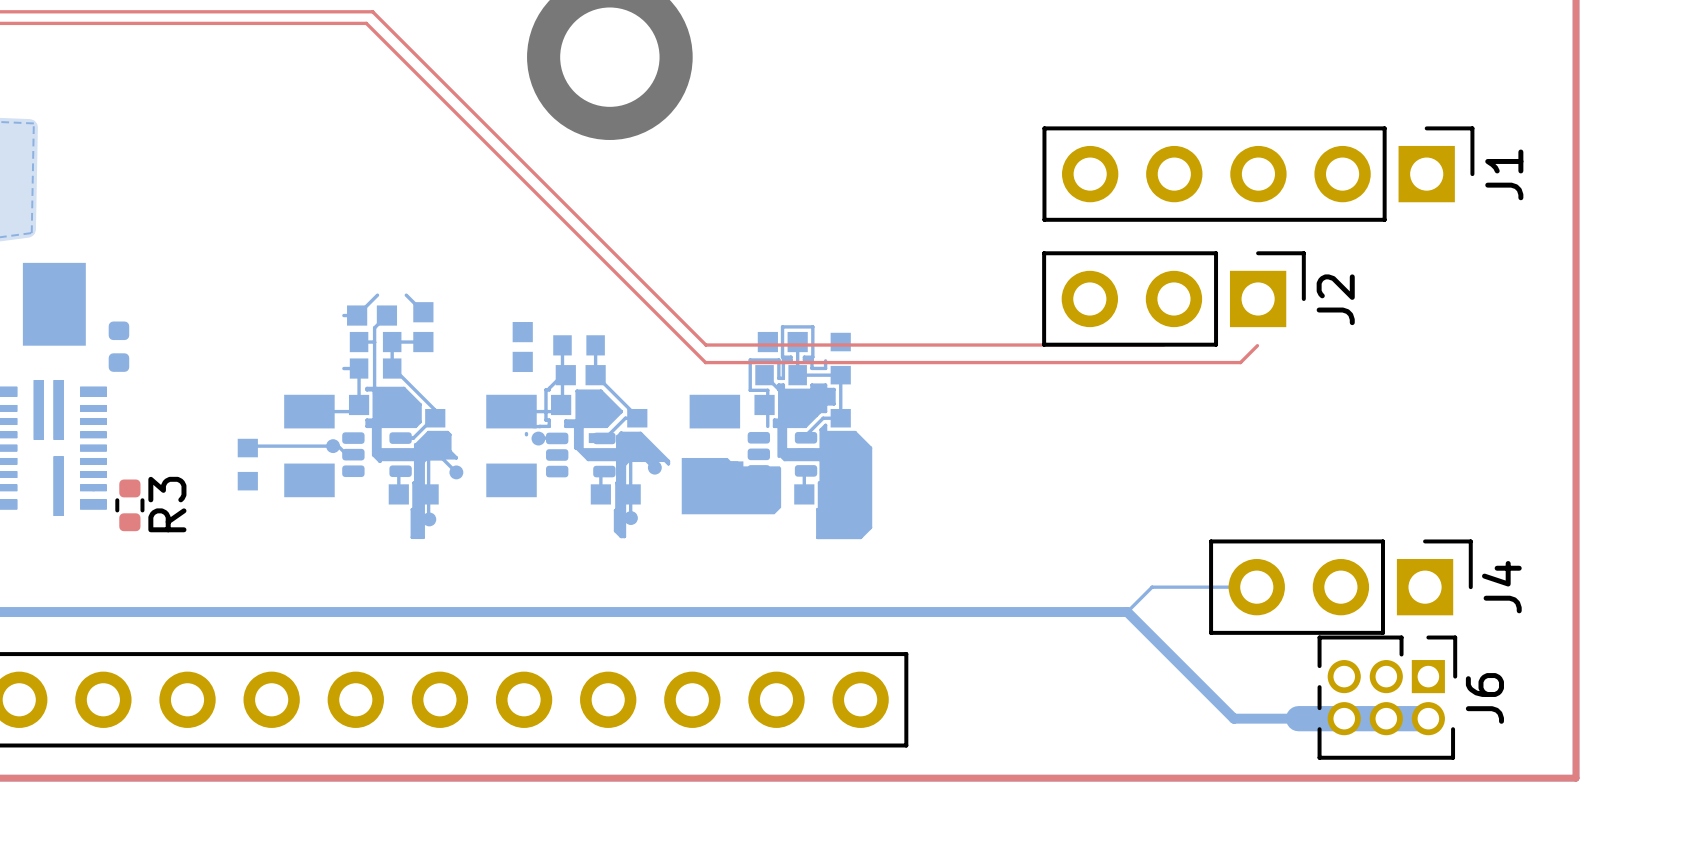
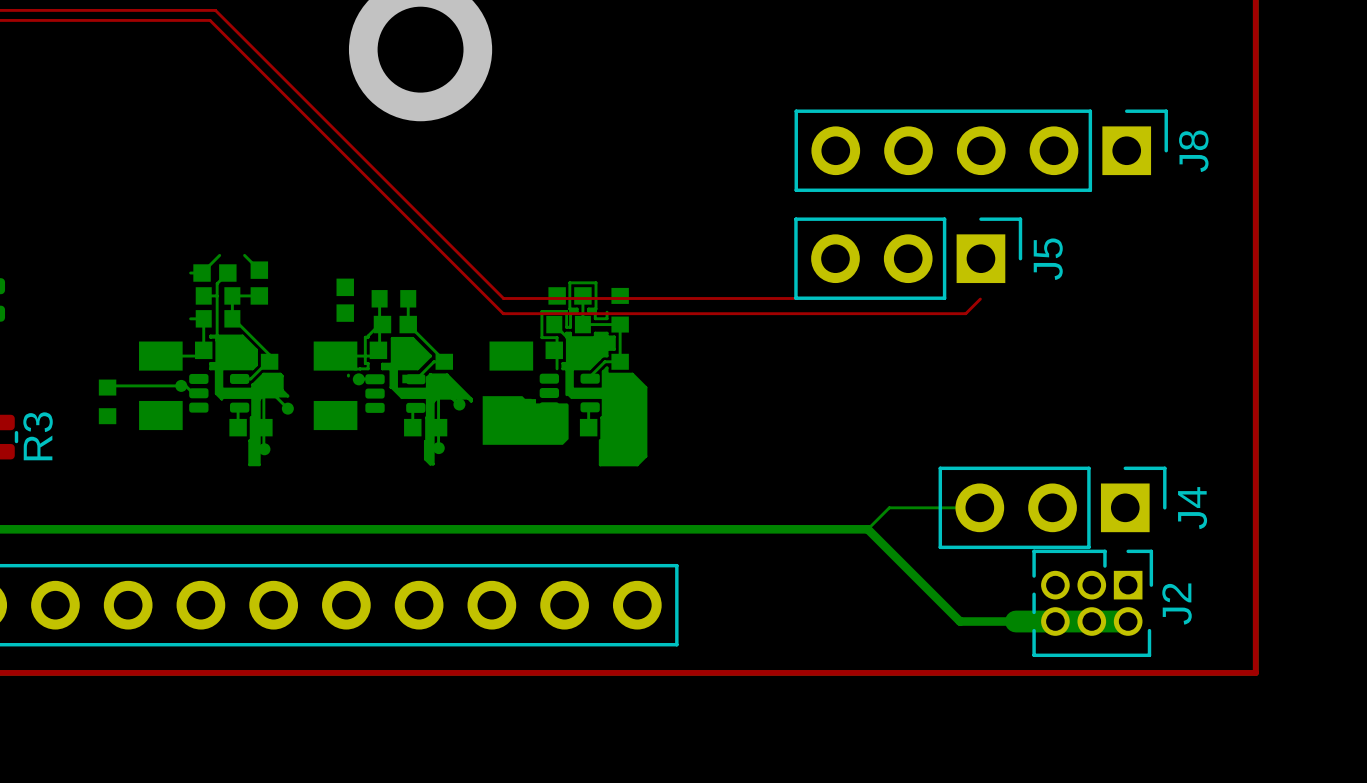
J1 name: J1 (1504, 174) -> J8 (1193, 151)
J2 name: J2 (1335, 299) -> J5 (1048, 259)
J6 name: J6 (1484, 698) -> J2 (1177, 604)

